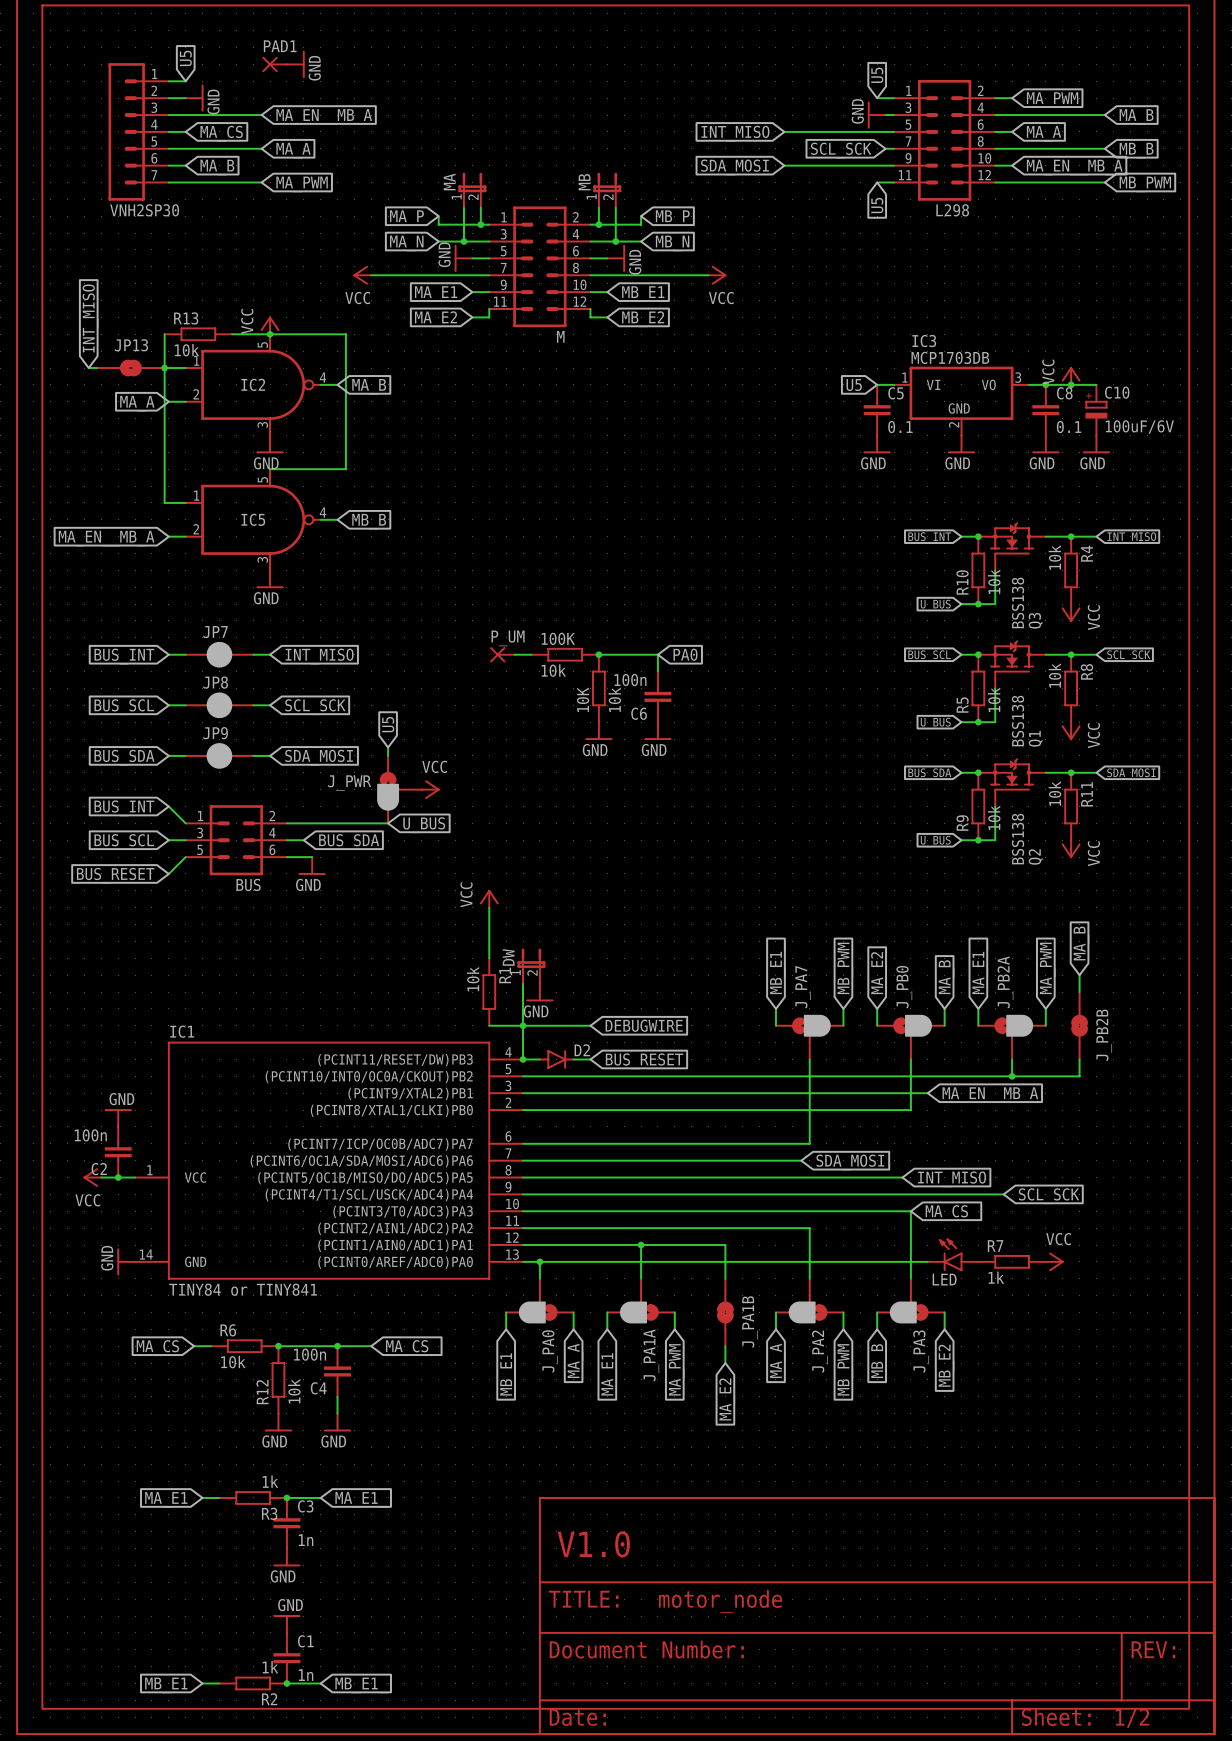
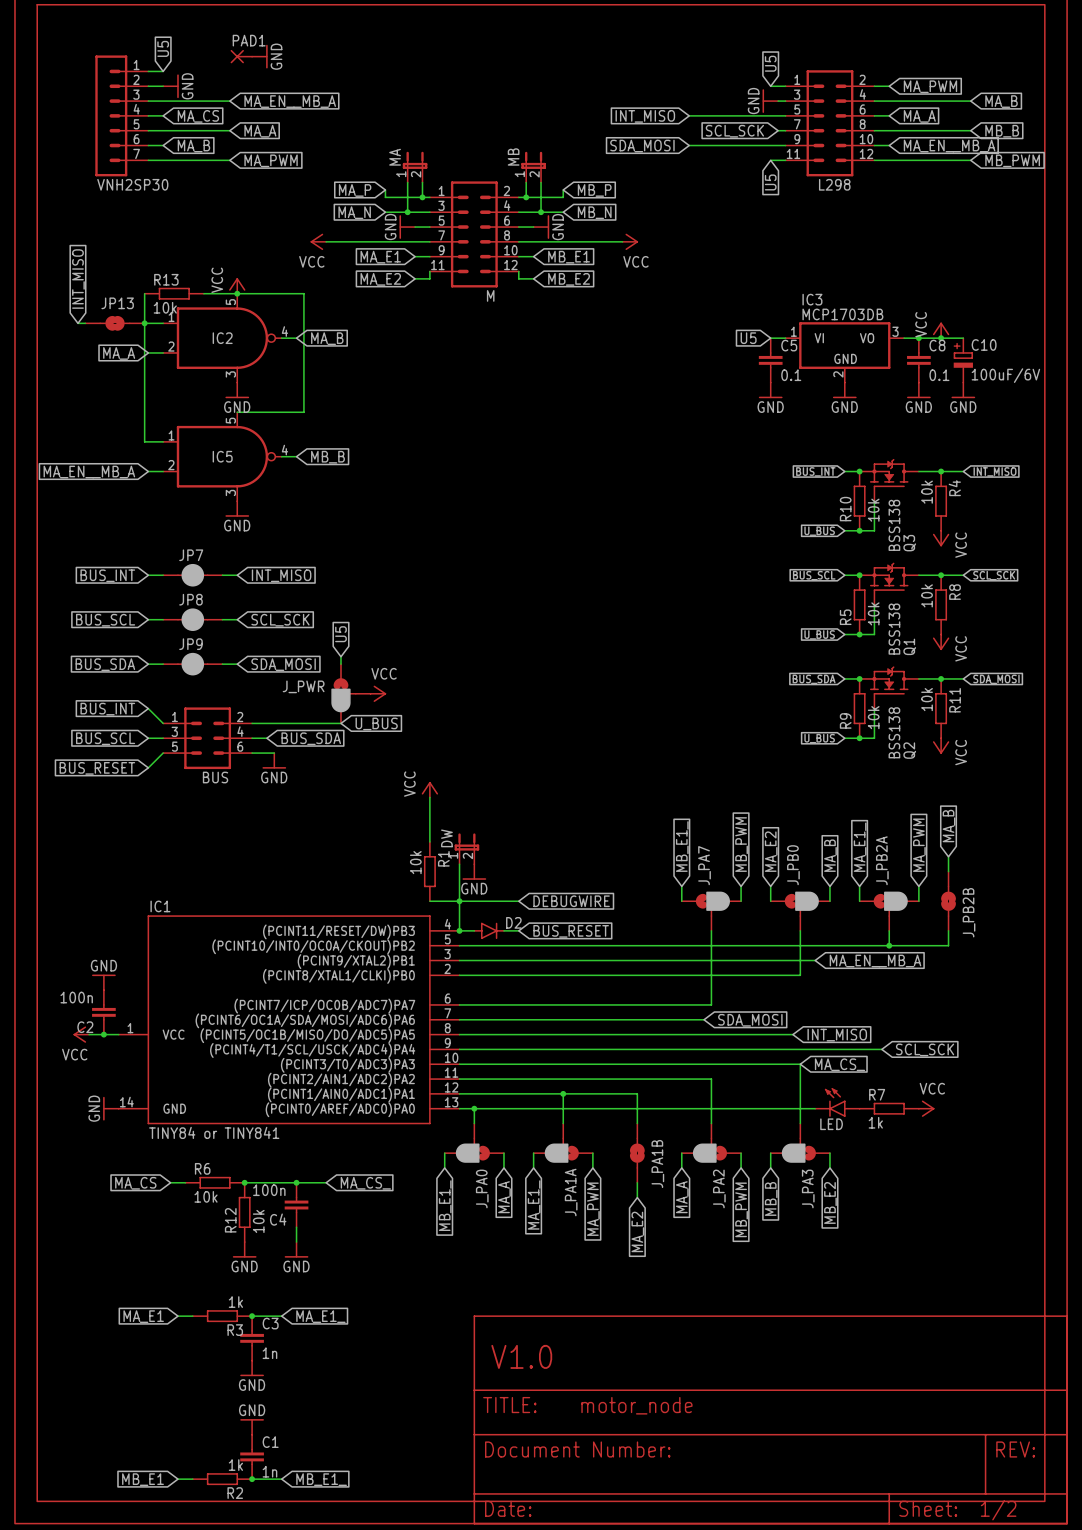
P_UM: (502, 654) -> none
wire: (514, 654) (531, 654) -> none
100K: 10k (565, 654) -> none
wire: (598, 654) (657, 654) (657, 671) -> none
junction: (598, 654) -> none
global label: PA0 (685, 654) -> none
10K: 10k (598, 688) -> none
C6: 100n (657, 696) -> none
power symbol: GND (598, 731) -> none
power symbol: GND (657, 731) -> none

